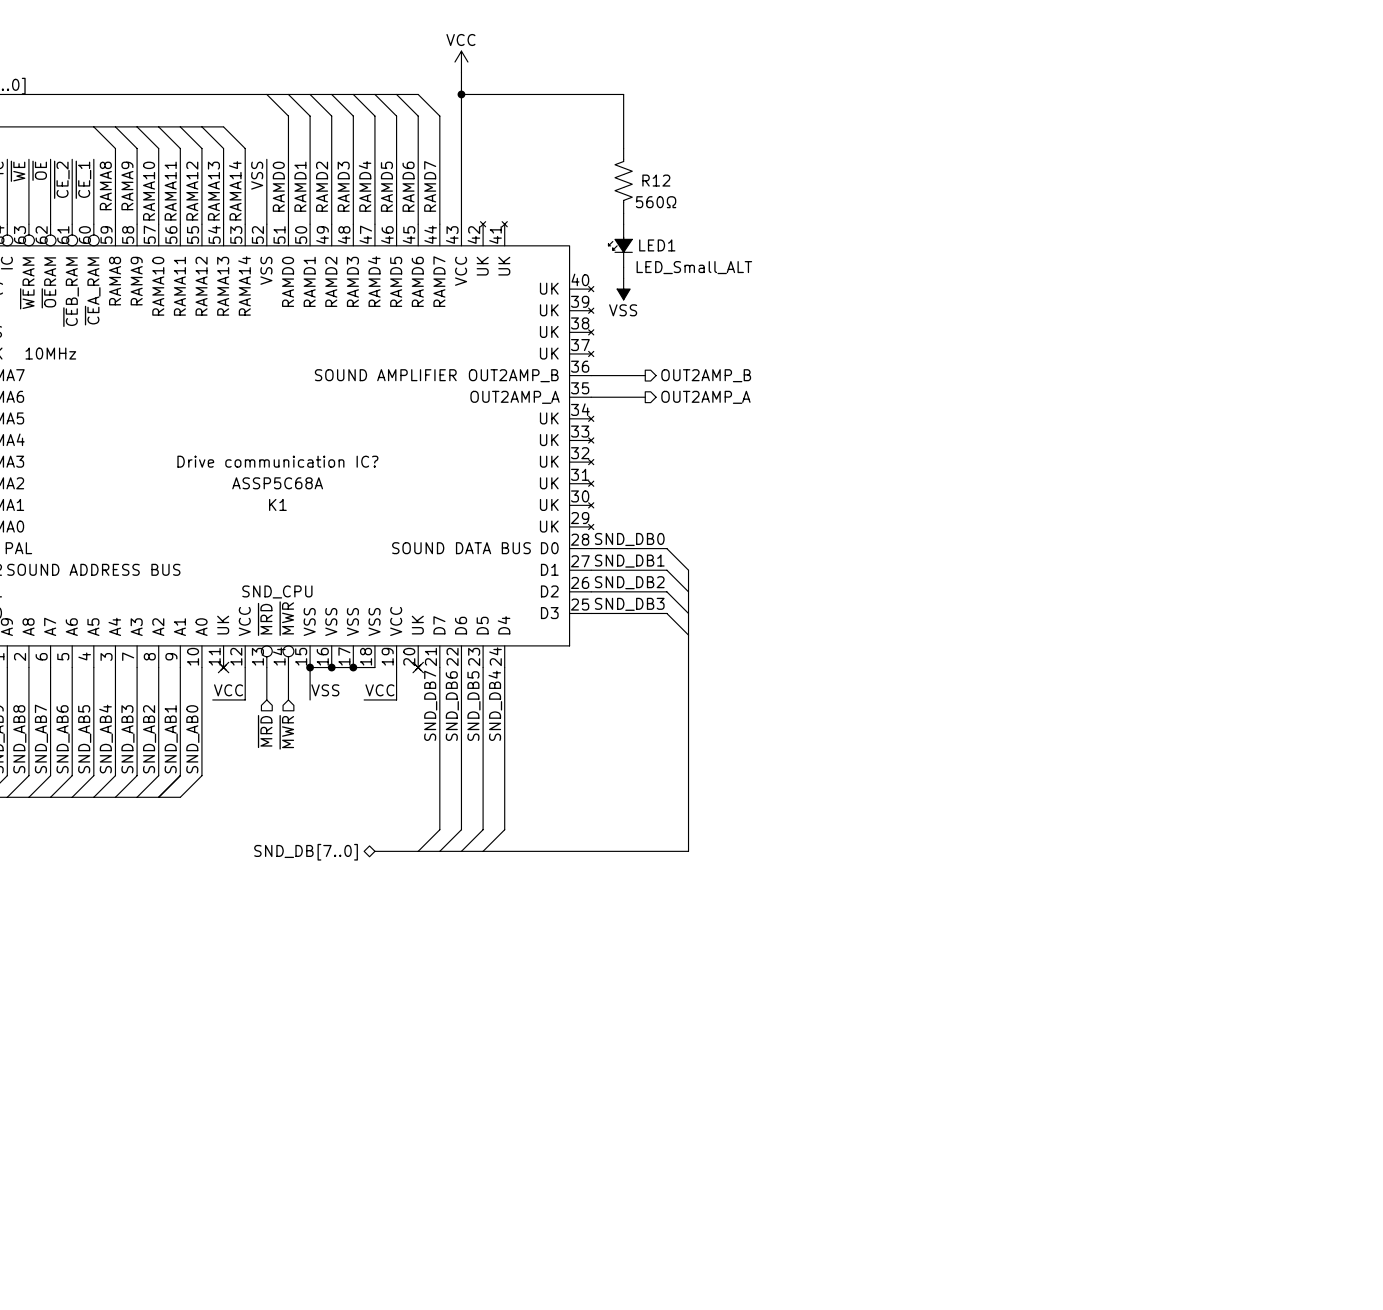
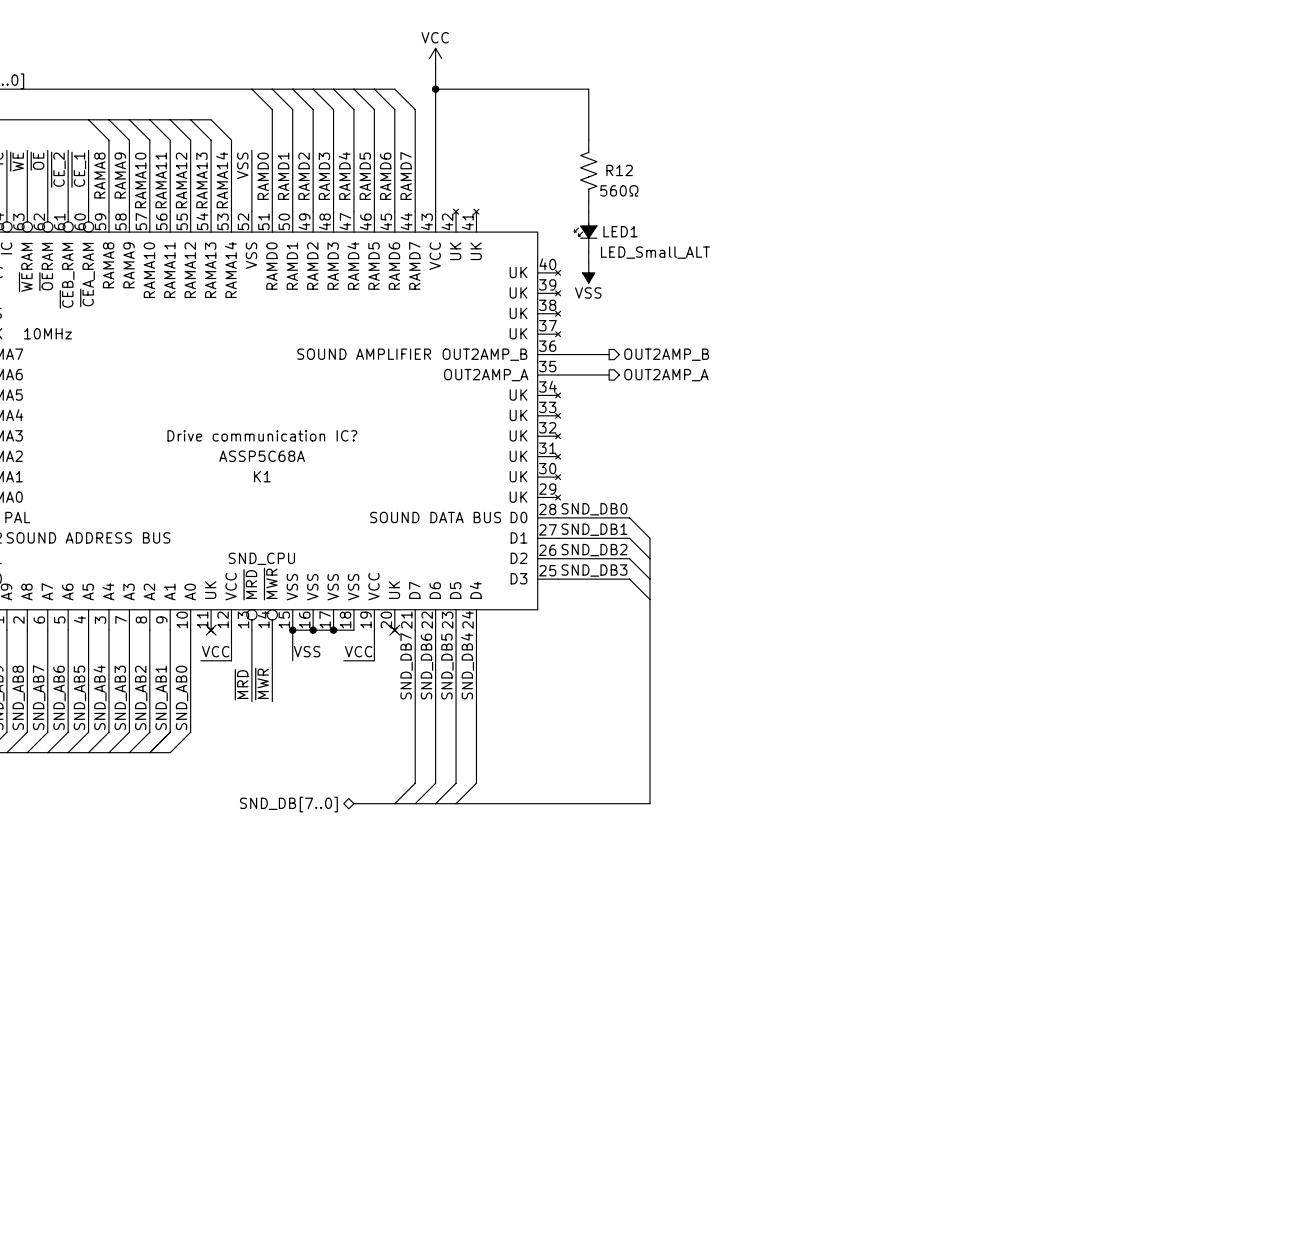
wire: none -> (251, 660) (251, 701)
wire: none -> (272, 660) (272, 701)
label: none -> ~{MWR} (262, 684)
label: none -> ~{MRD} (241, 684)
hierarchical label: ~{MRD} (265, 731) -> none
hierarchical label: ~{MWR} (286, 732) -> none

